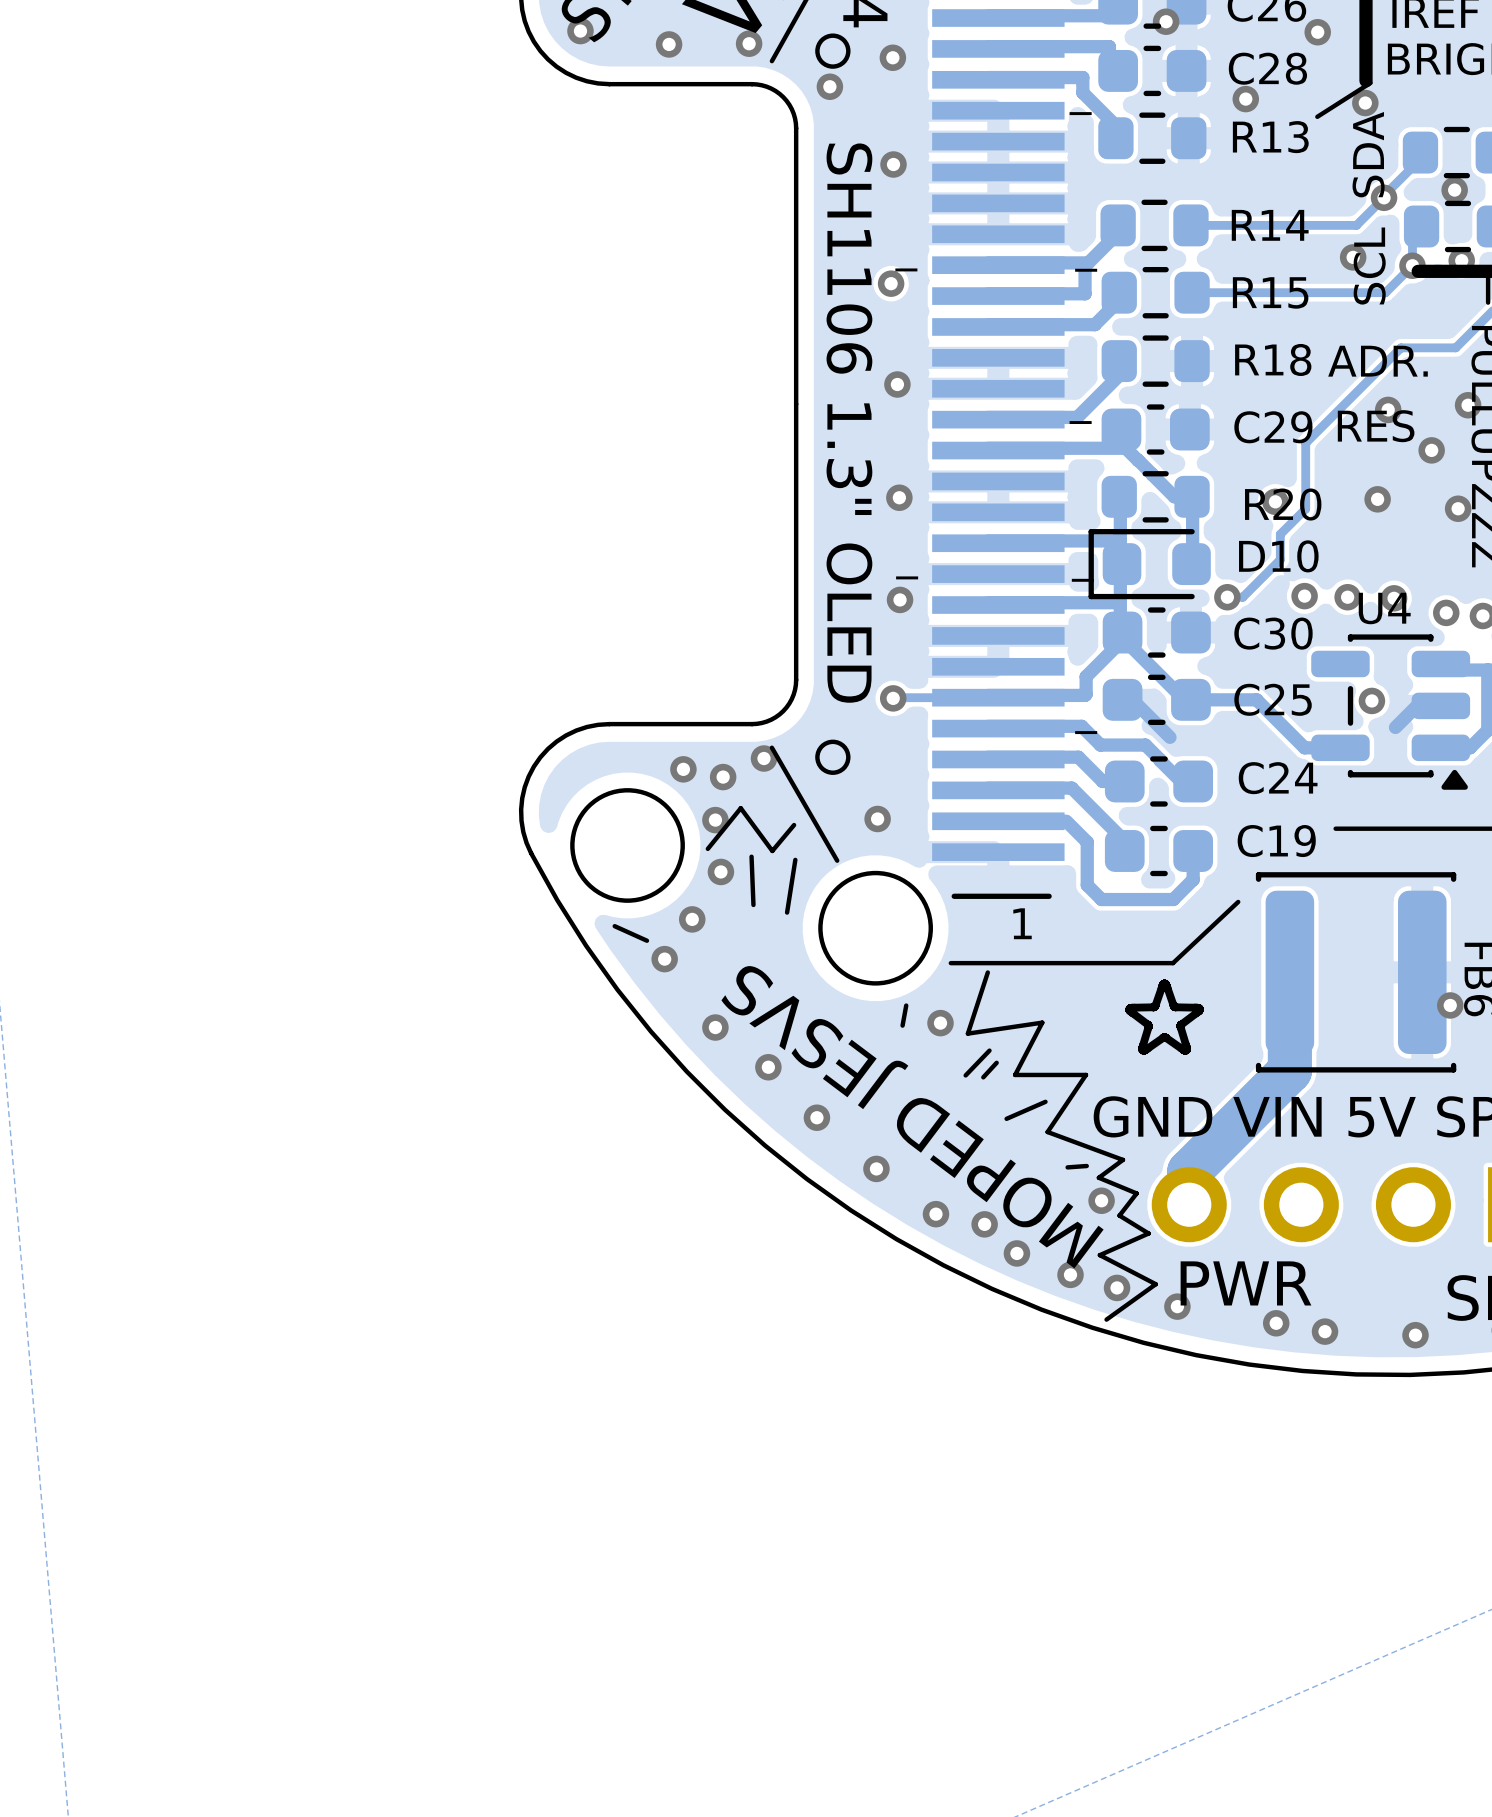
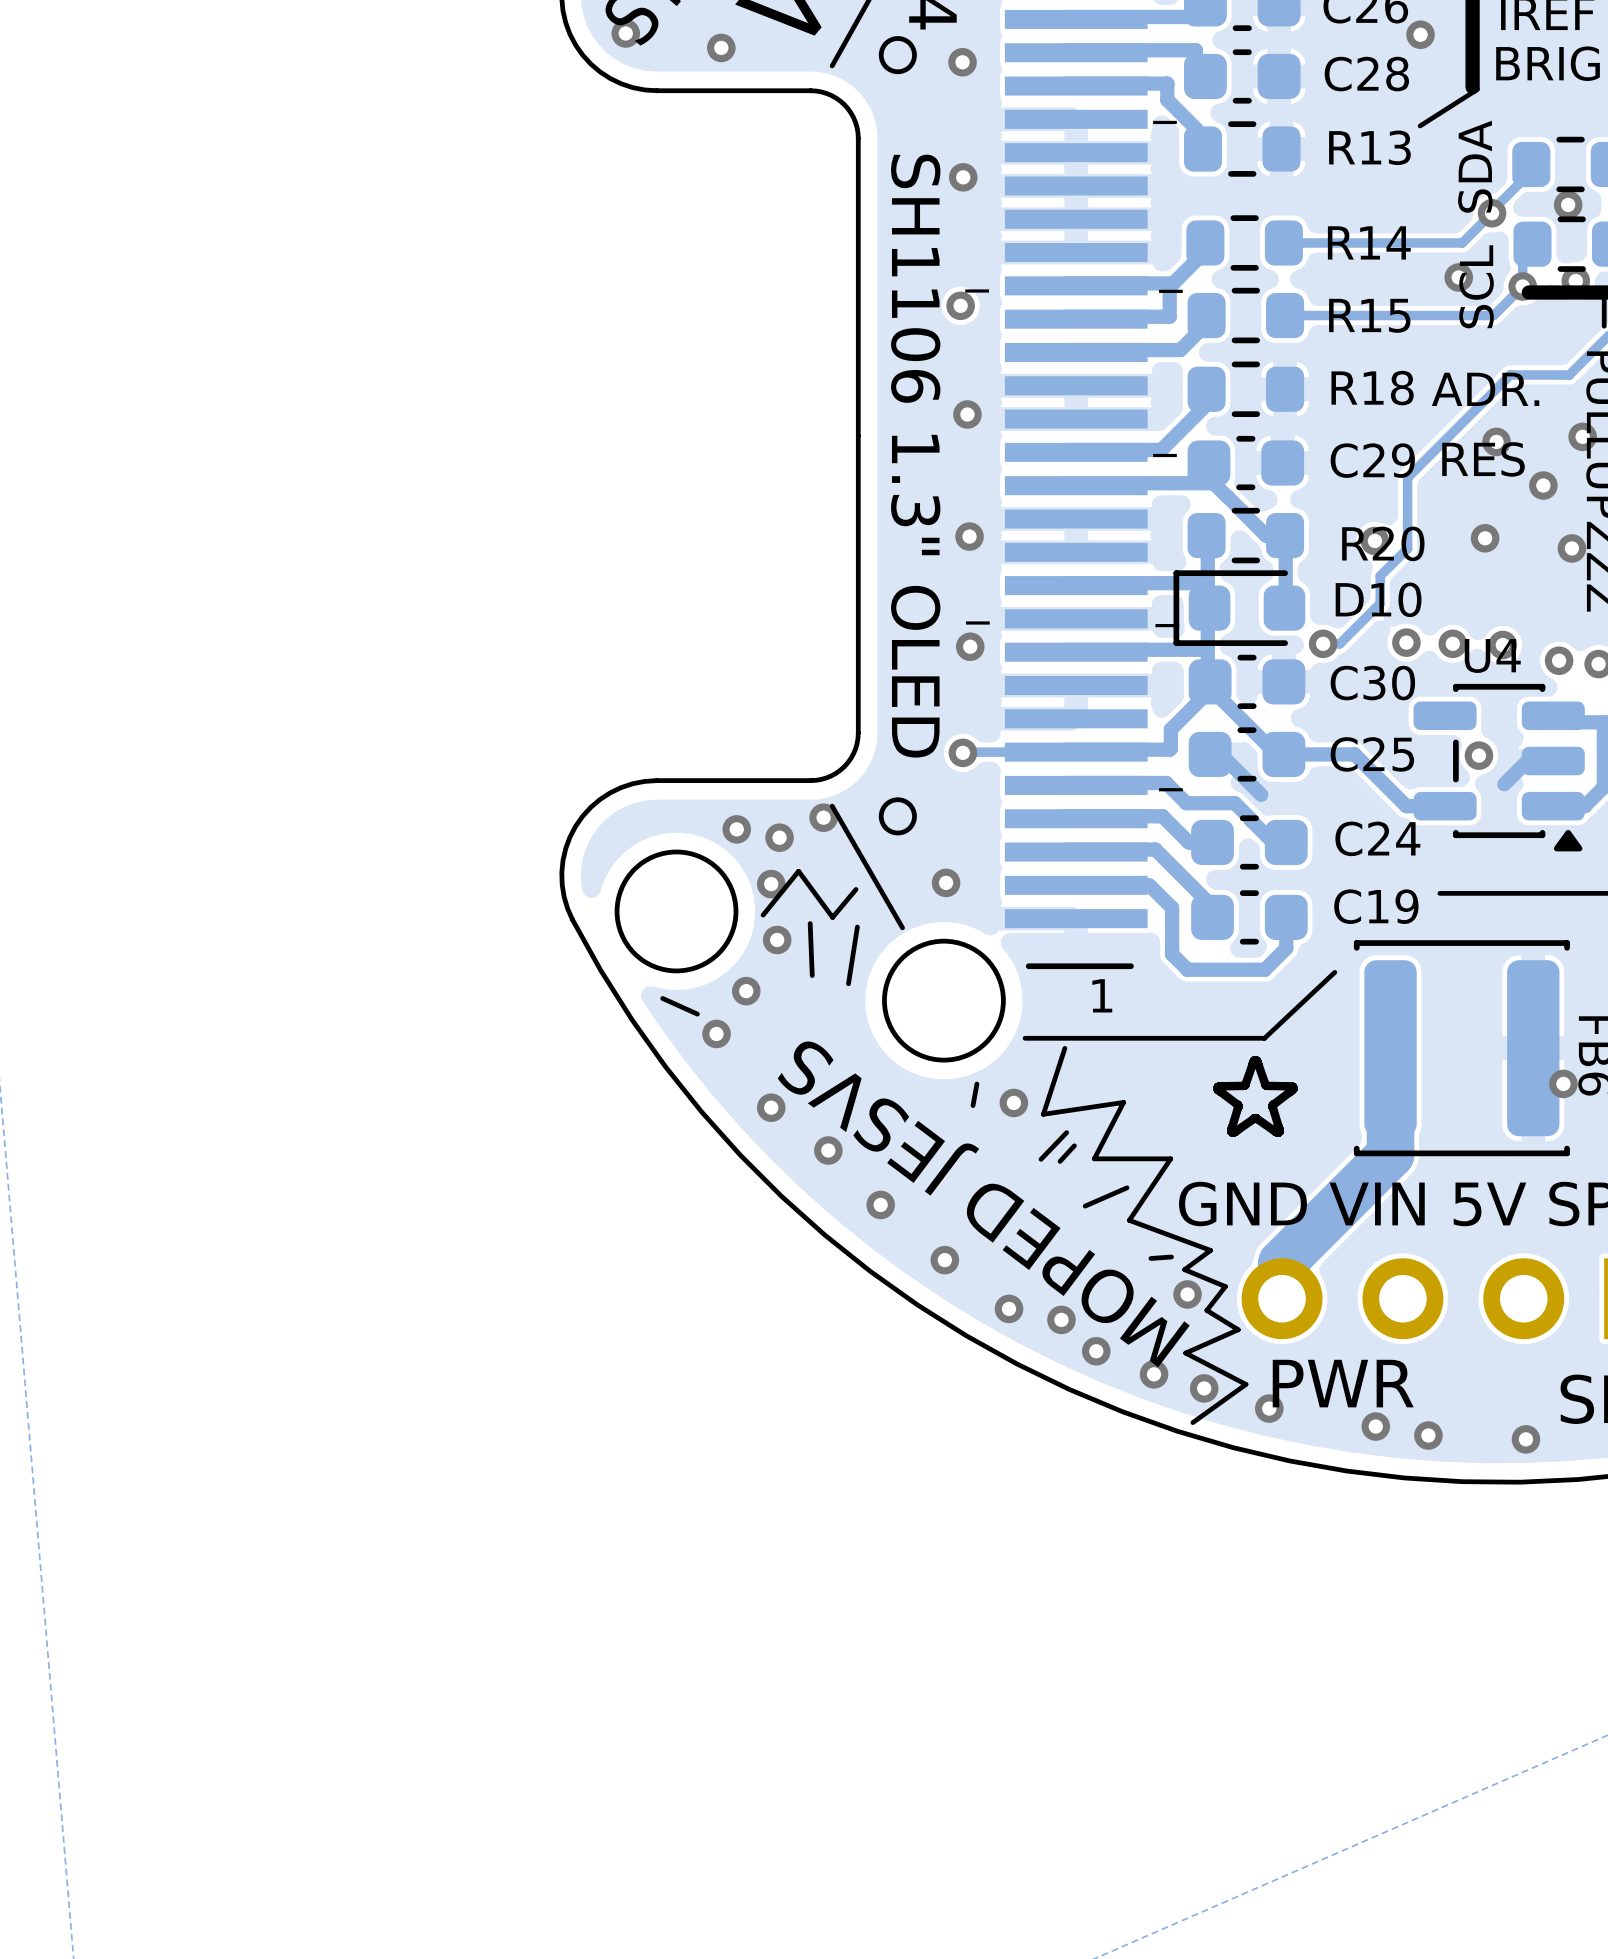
via: (1166, 21) -> none
via: (749, 43) -> none
via: (829, 86) -> none
via: (1245, 99) -> none
via: (1365, 103) -> none

